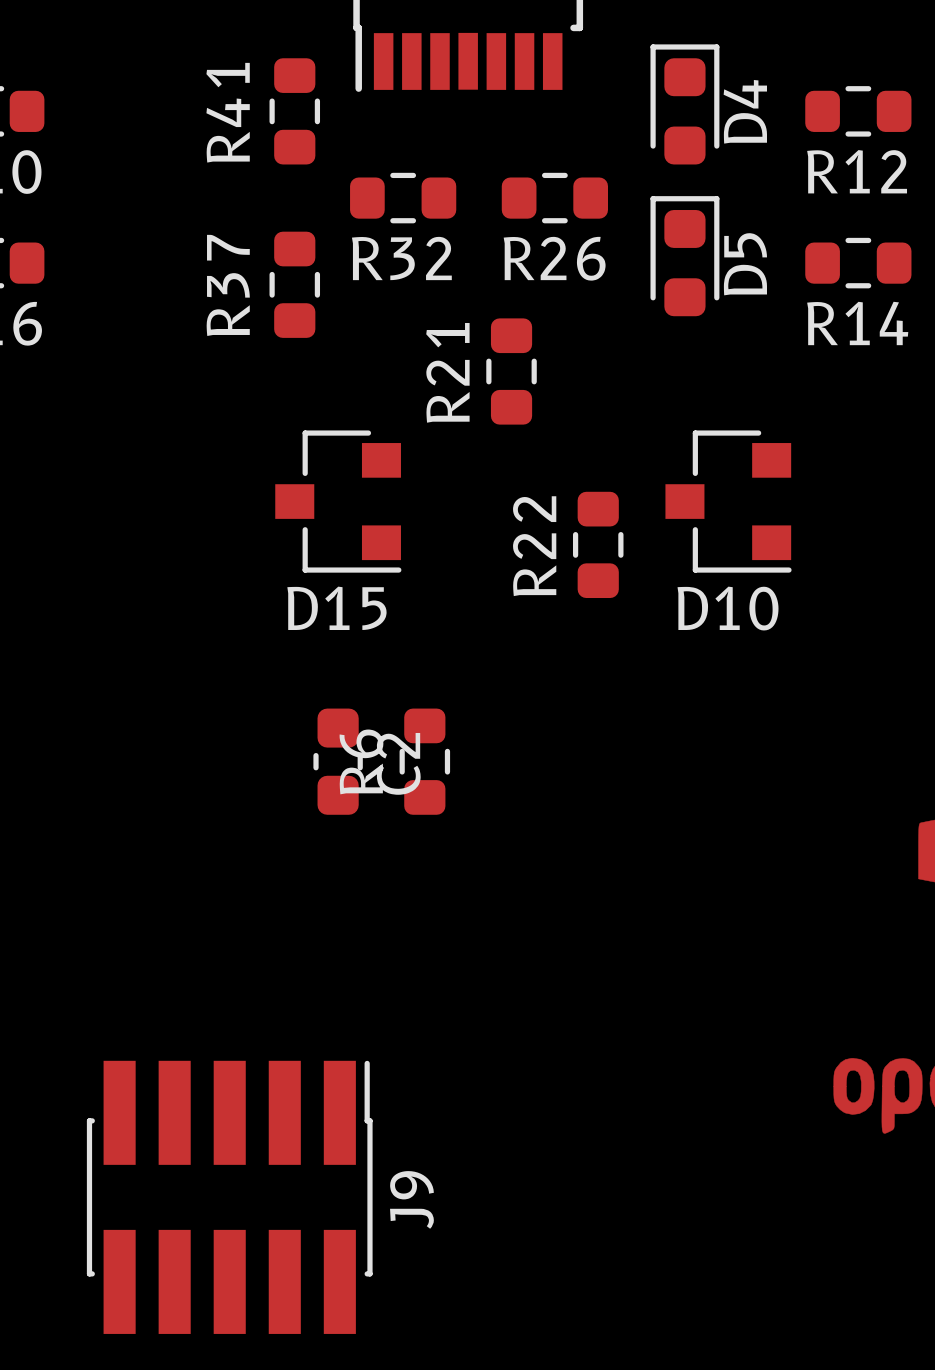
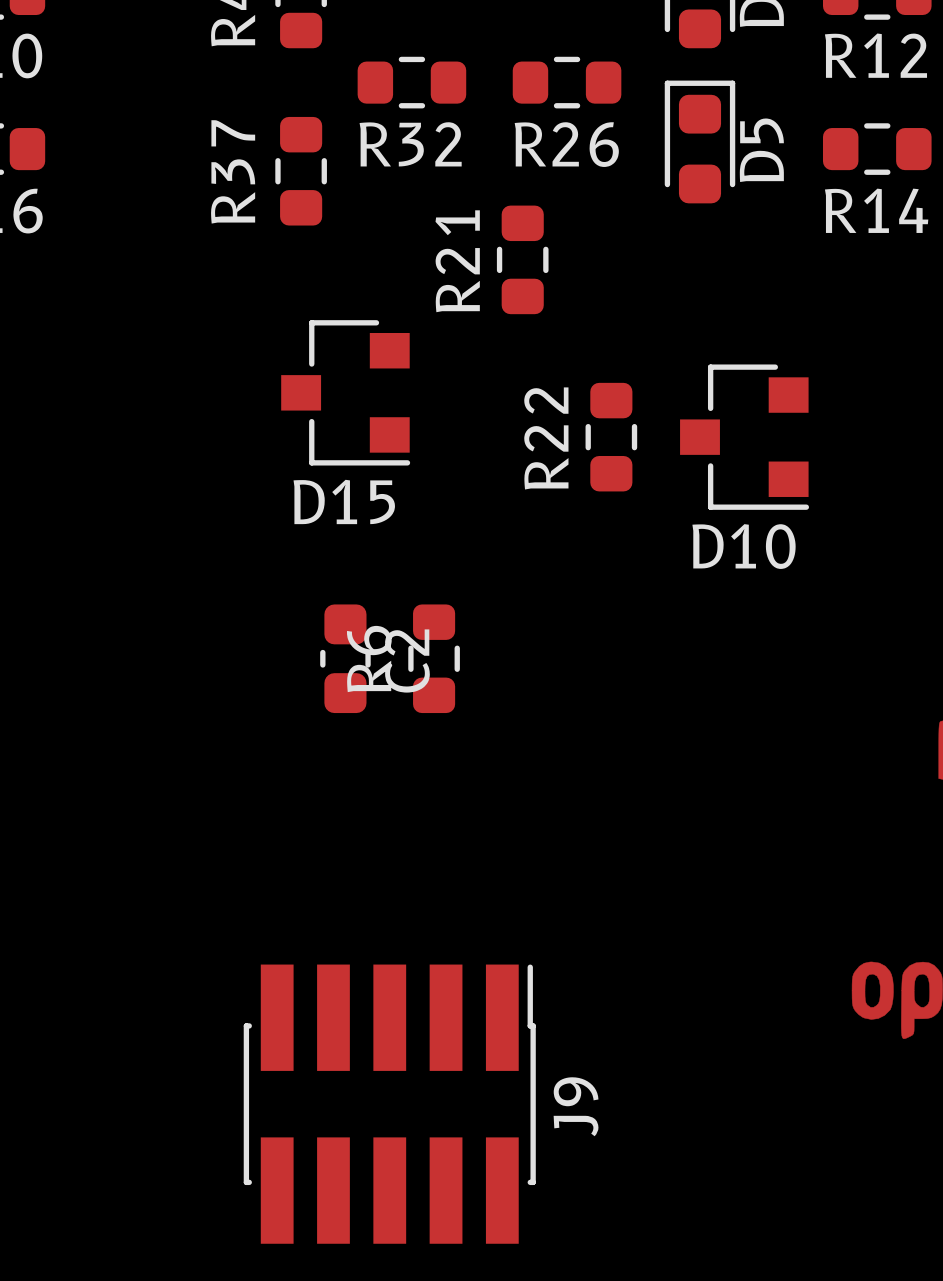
D10 position: (728, 501) -> (744, 437)
J9 position: (229, 1197) -> (389, 1104)

